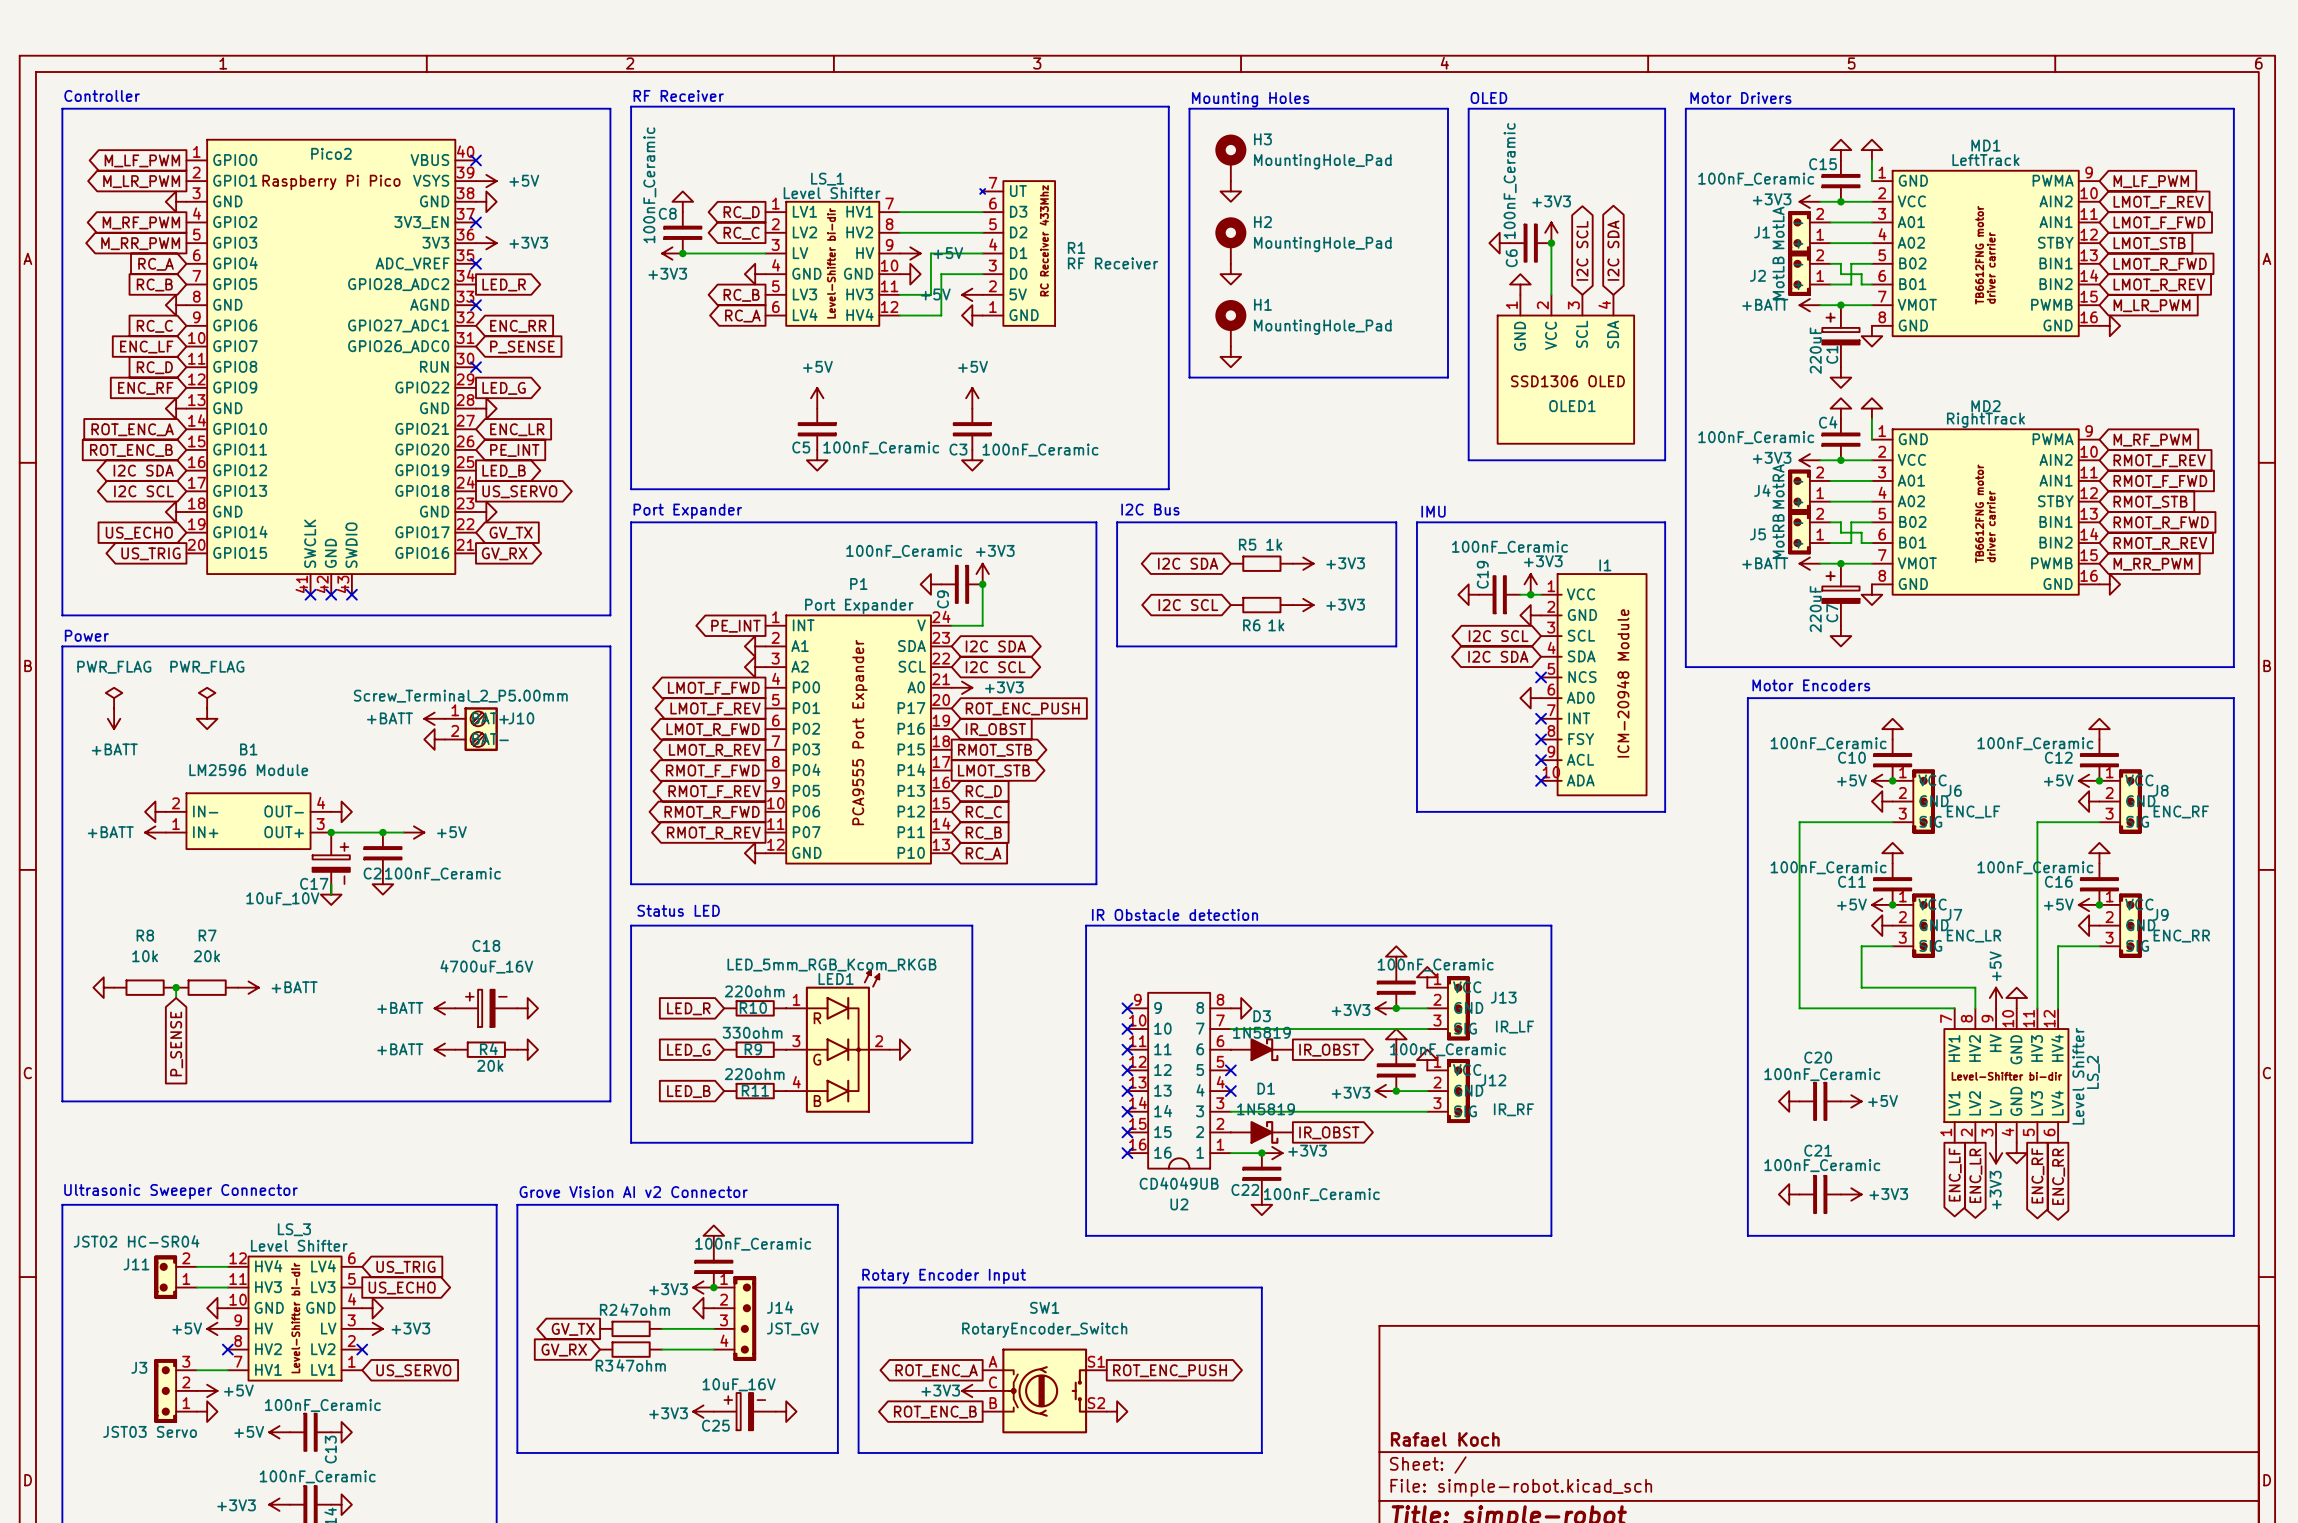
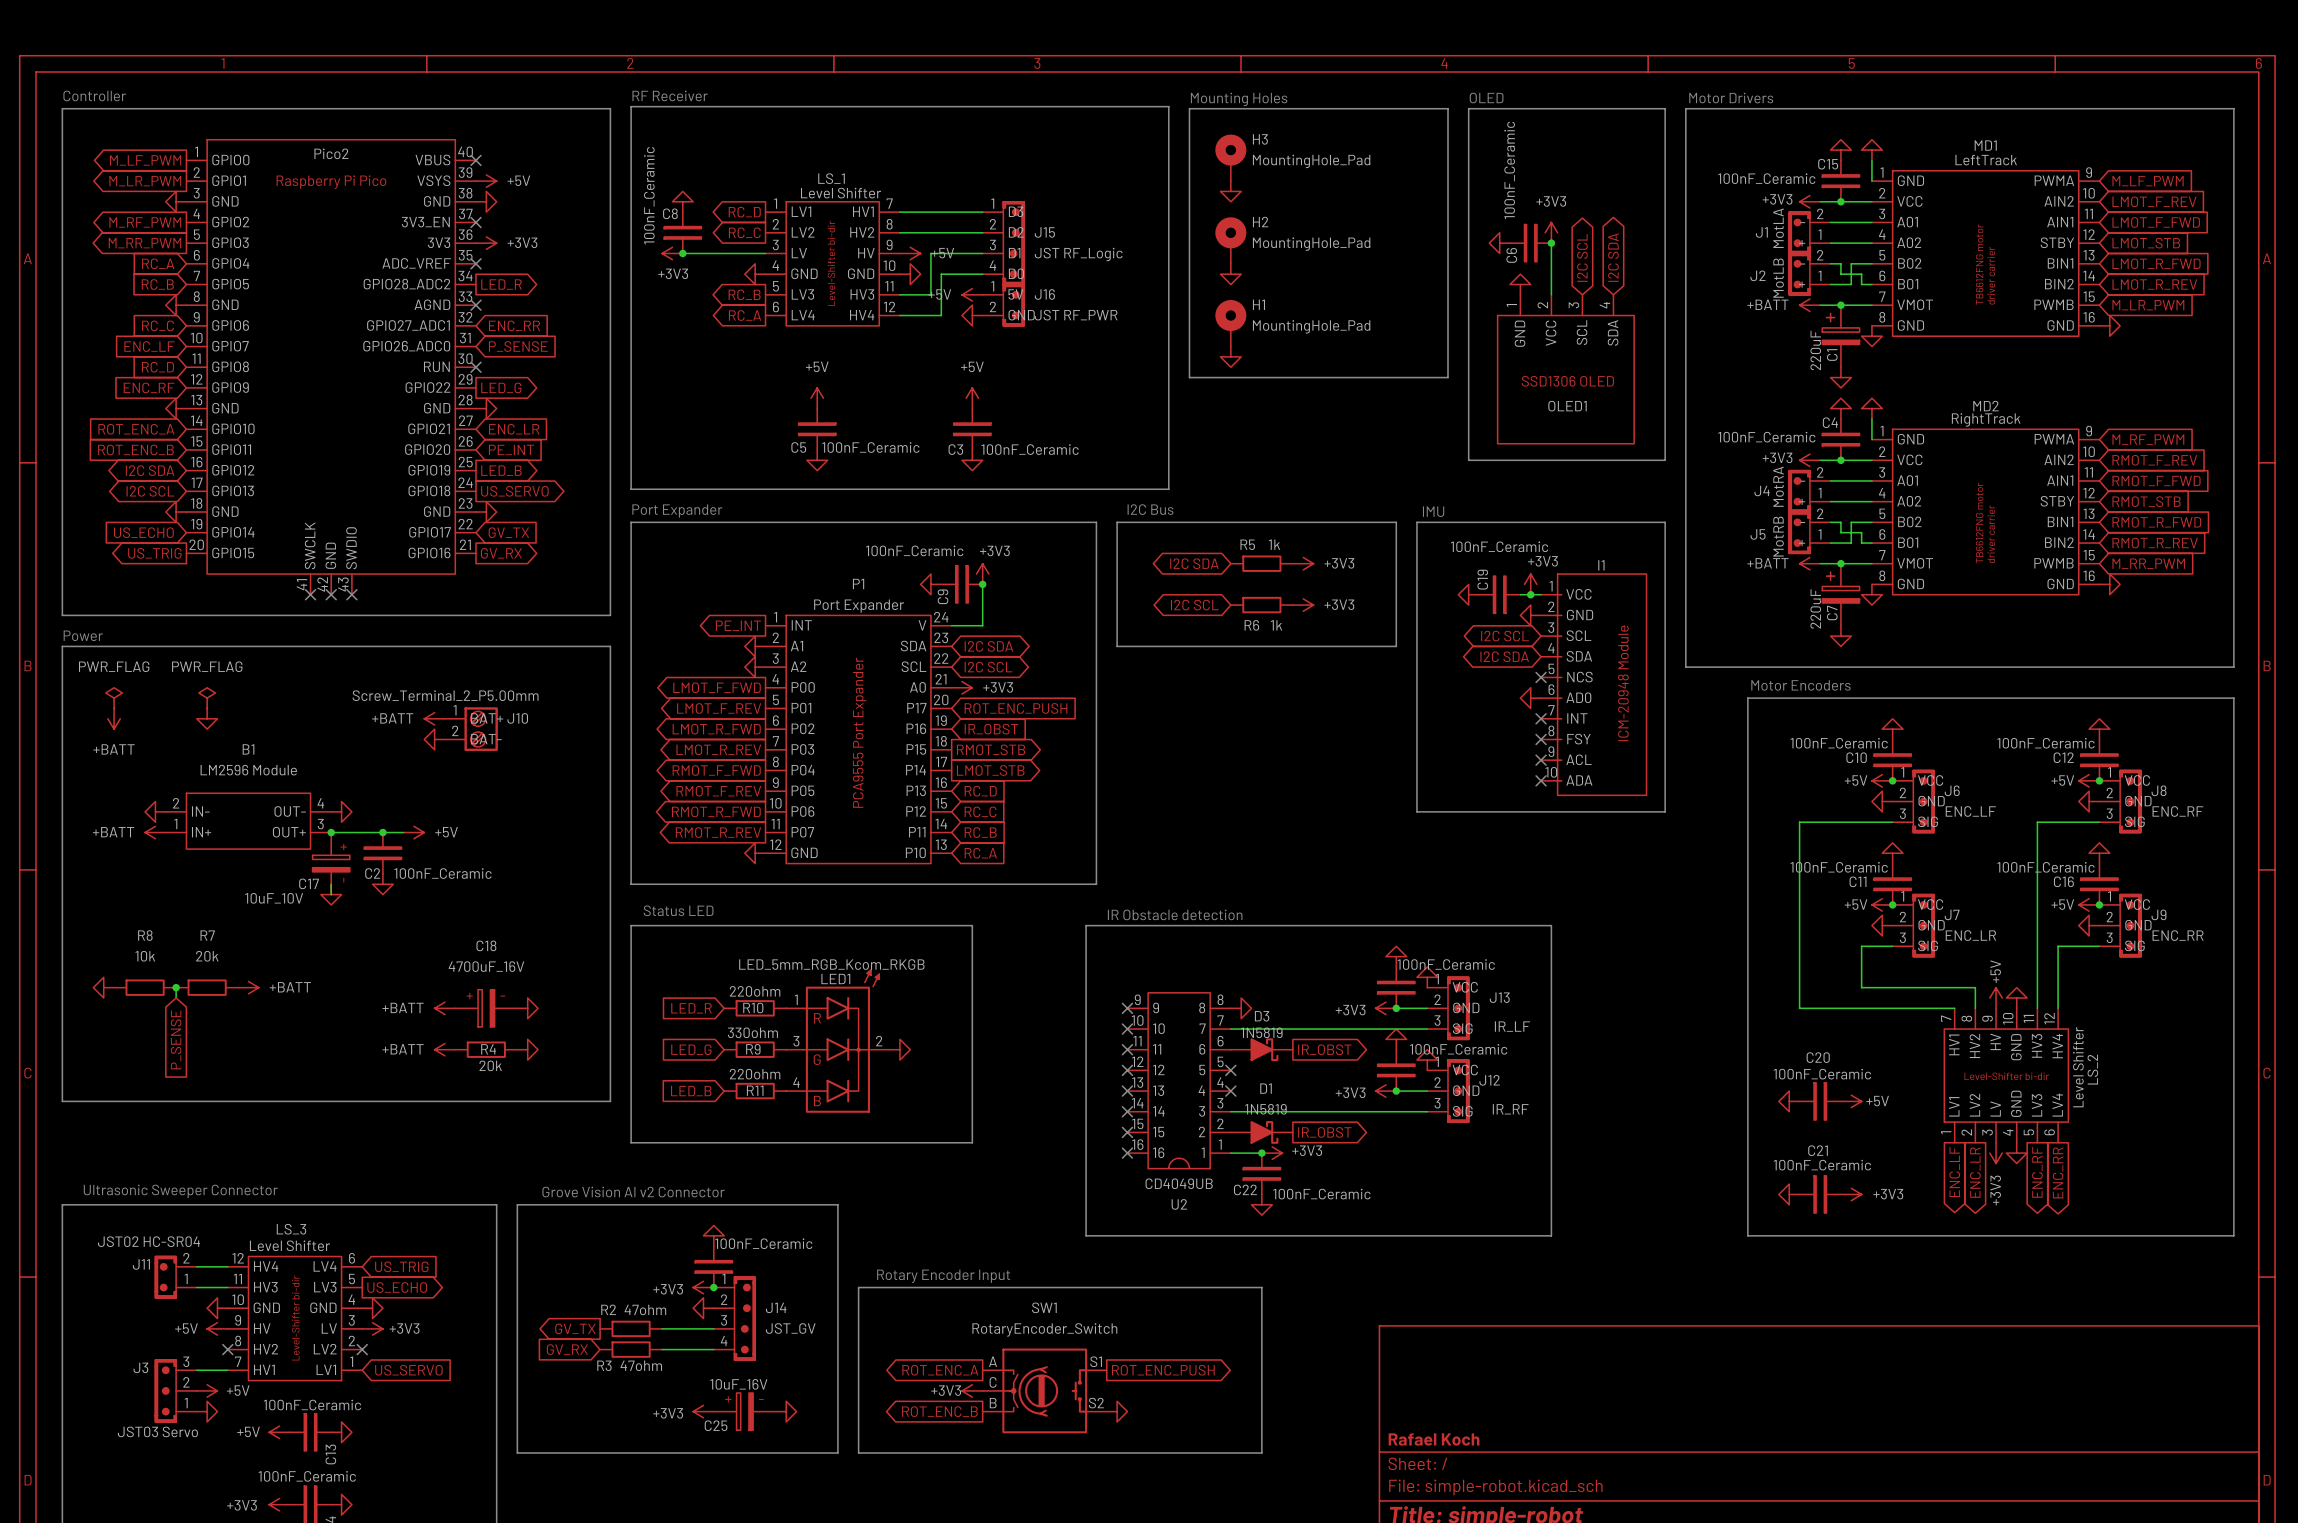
J15: none -> JST RF_Logic (1003, 243)
R1: RF Receiver (1017, 253) -> none
J16: none -> JST RF_PWR (1003, 305)

